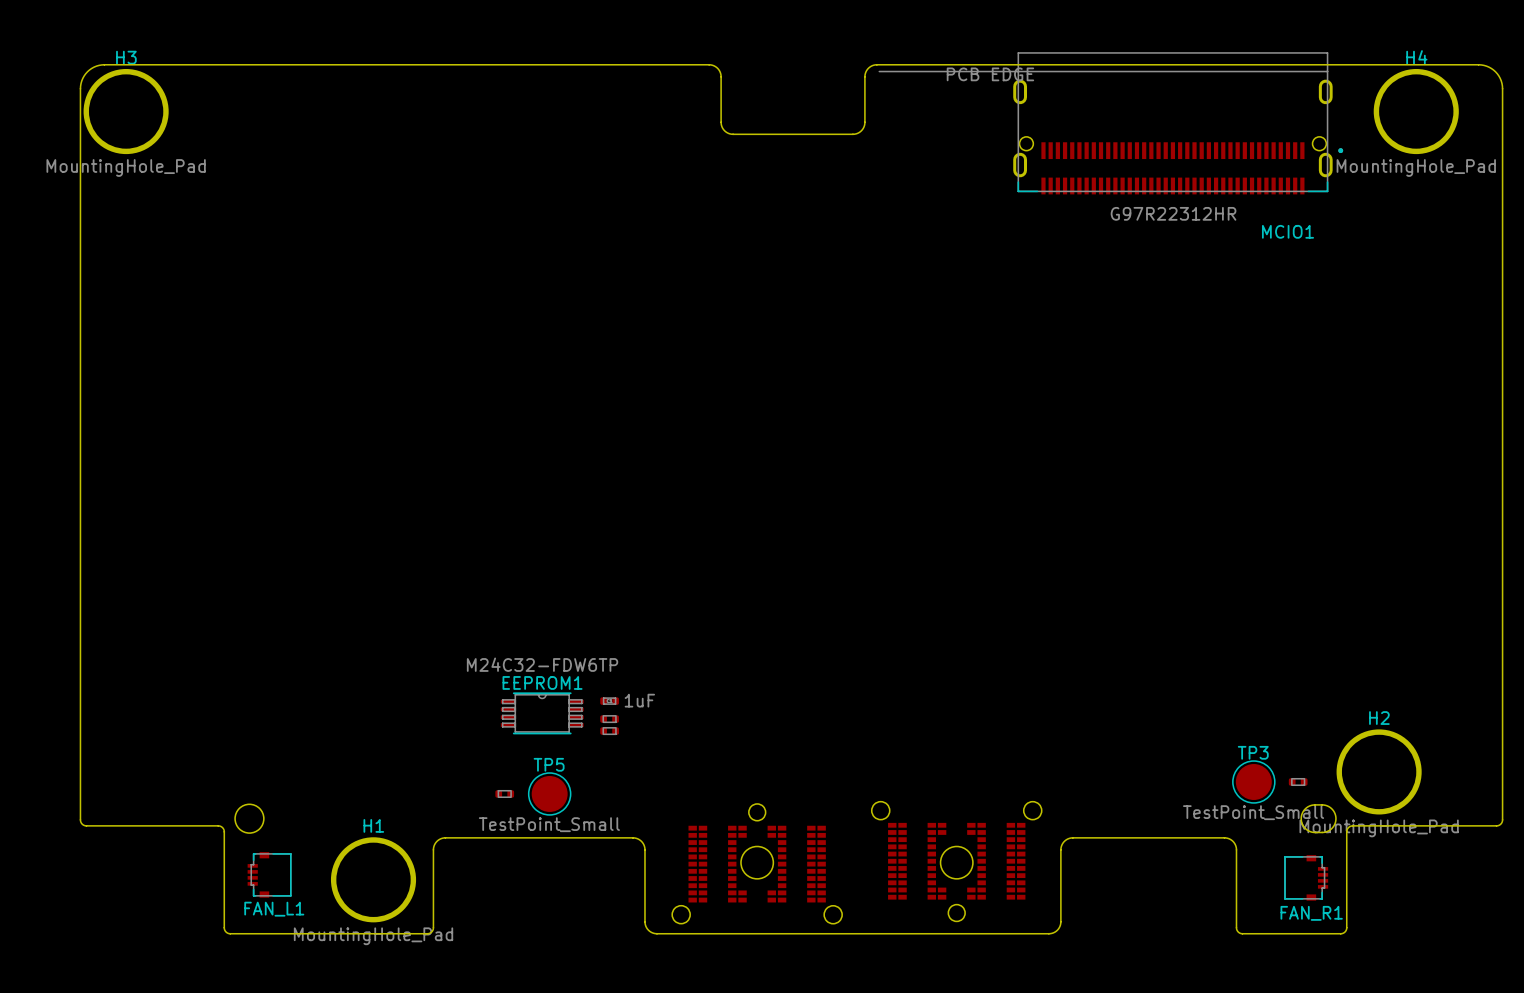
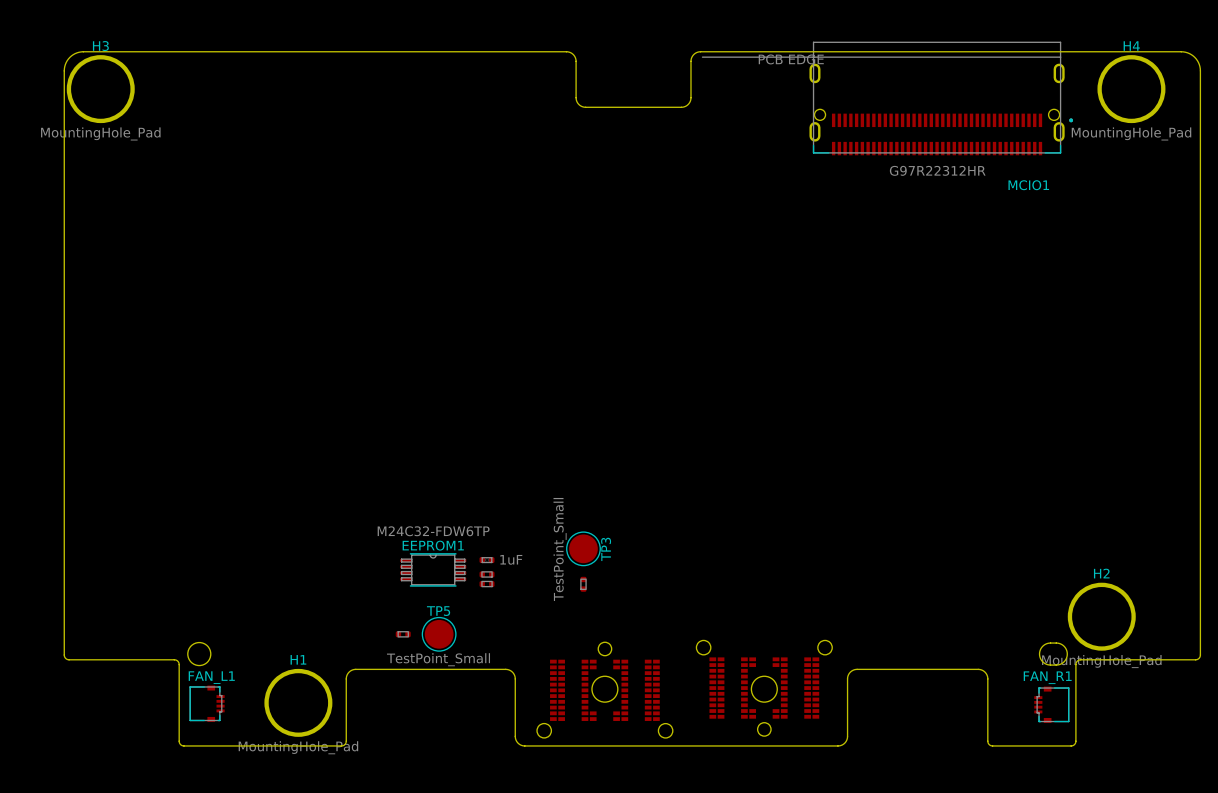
part: none -> (583, 584)
TP3 name rotation: 0° (1253, 752) -> 90° counterclockwise (606, 549)
TP3 name position: TP3 (1253, 752) -> TP3 (606, 549)
TP3 position: (1253, 781) -> (583, 548)
part: (1298, 781) -> none
TP3 value rotation: 0° (1253, 812) -> 90° counterclockwise (560, 549)
FAN_L1 rotation: 0° (269, 874) -> 180° (207, 703)
FAN_R1 rotation: 0° (1306, 877) -> 180° (1051, 704)

